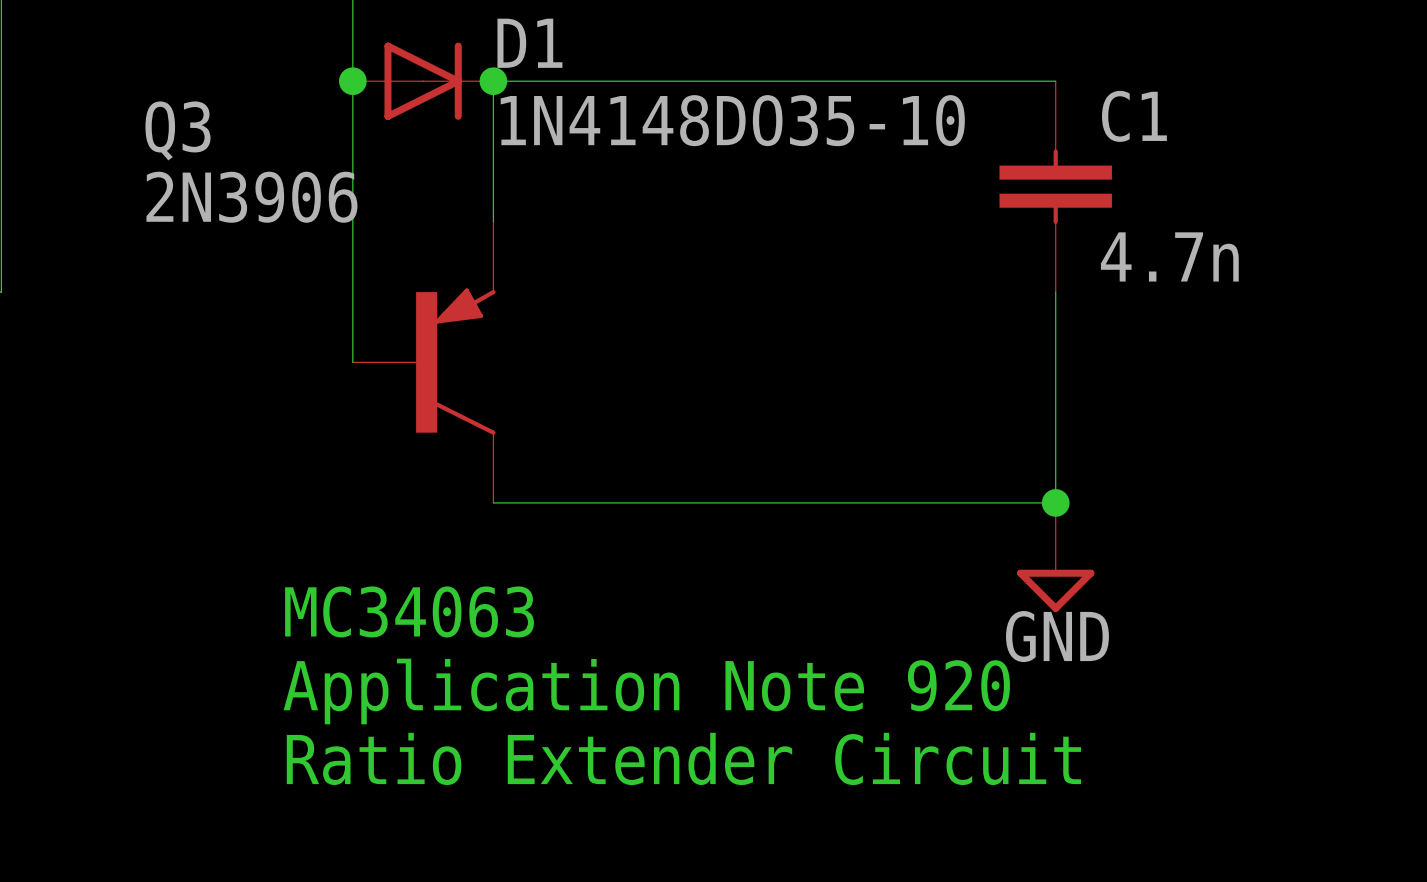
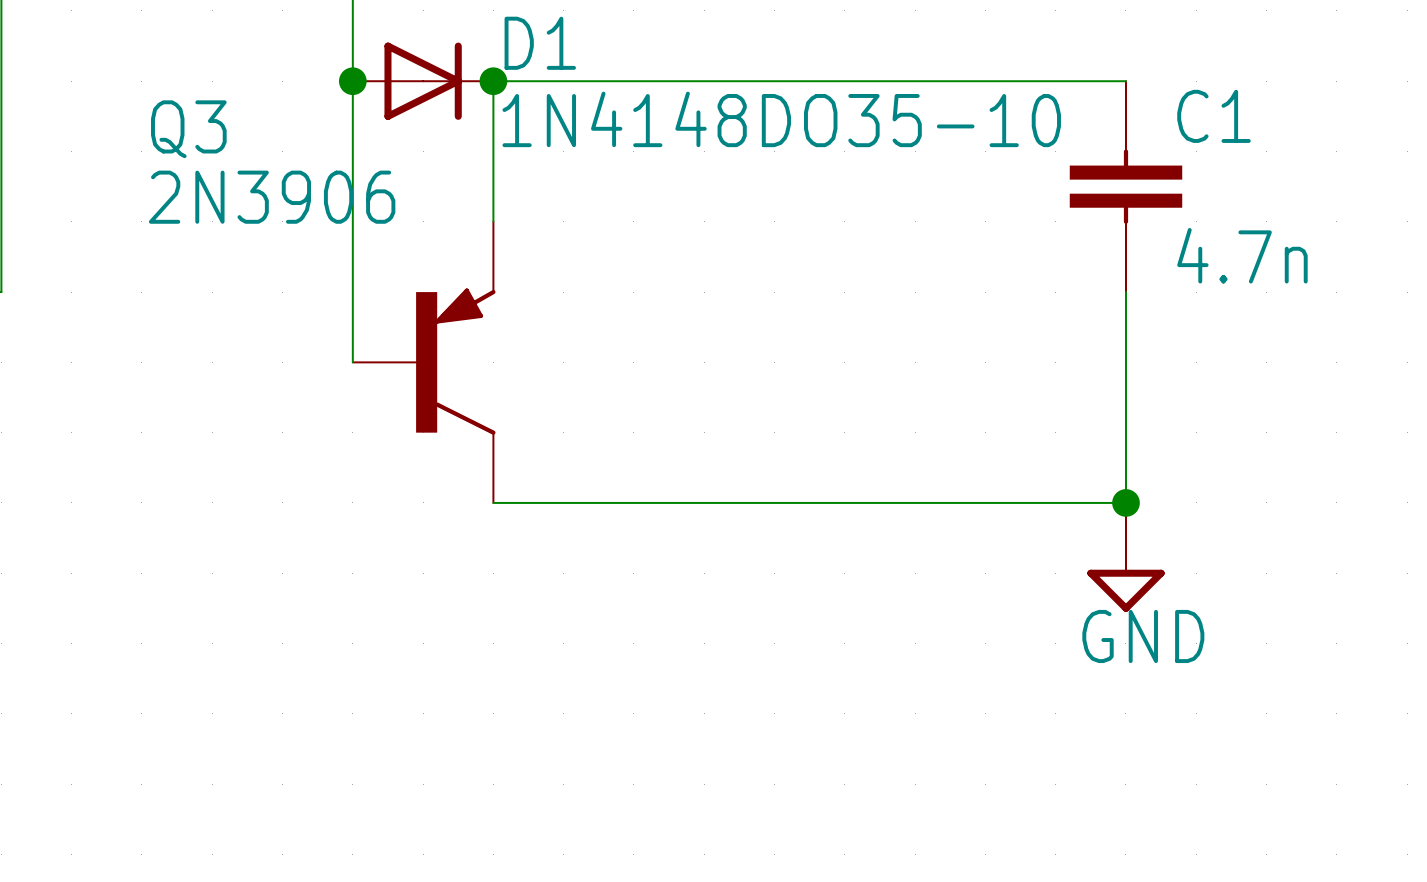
wire: none -> (1055, 81) (1125, 81)
C1 position: (1055, 186) -> (1125, 186)
wire: (1055, 292) (1055, 502) -> (1125, 292) (1125, 502) (1055, 502)
junction position: (1055, 502) -> (1125, 502)
power symbol position: GND (1055, 557) -> GND (1125, 557)
text: MC34063 (409, 611) -> none
text: Application Note 920 (646, 691) -> none
text: Ratio Extender Circuit (683, 758) -> none

